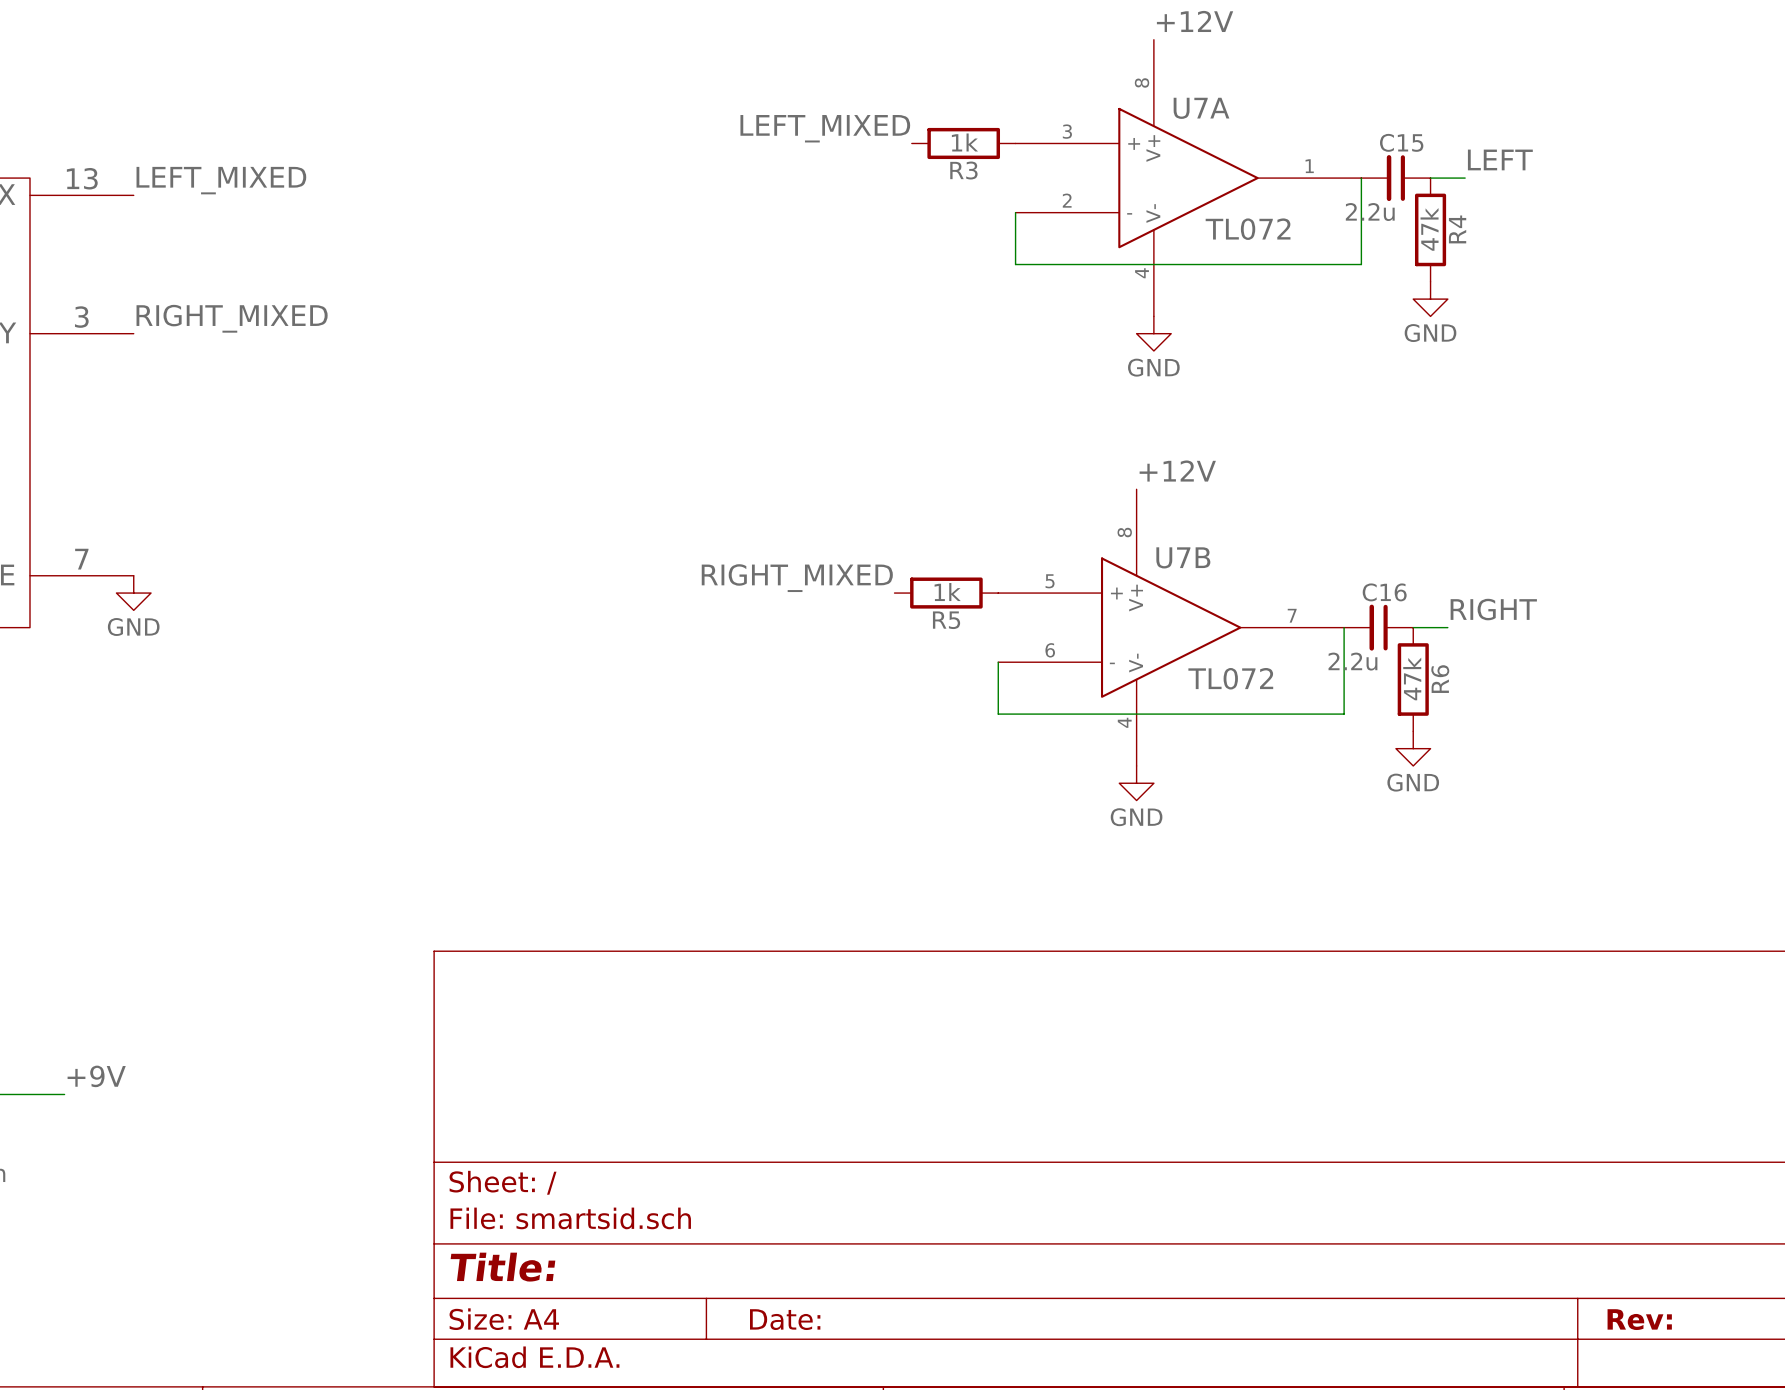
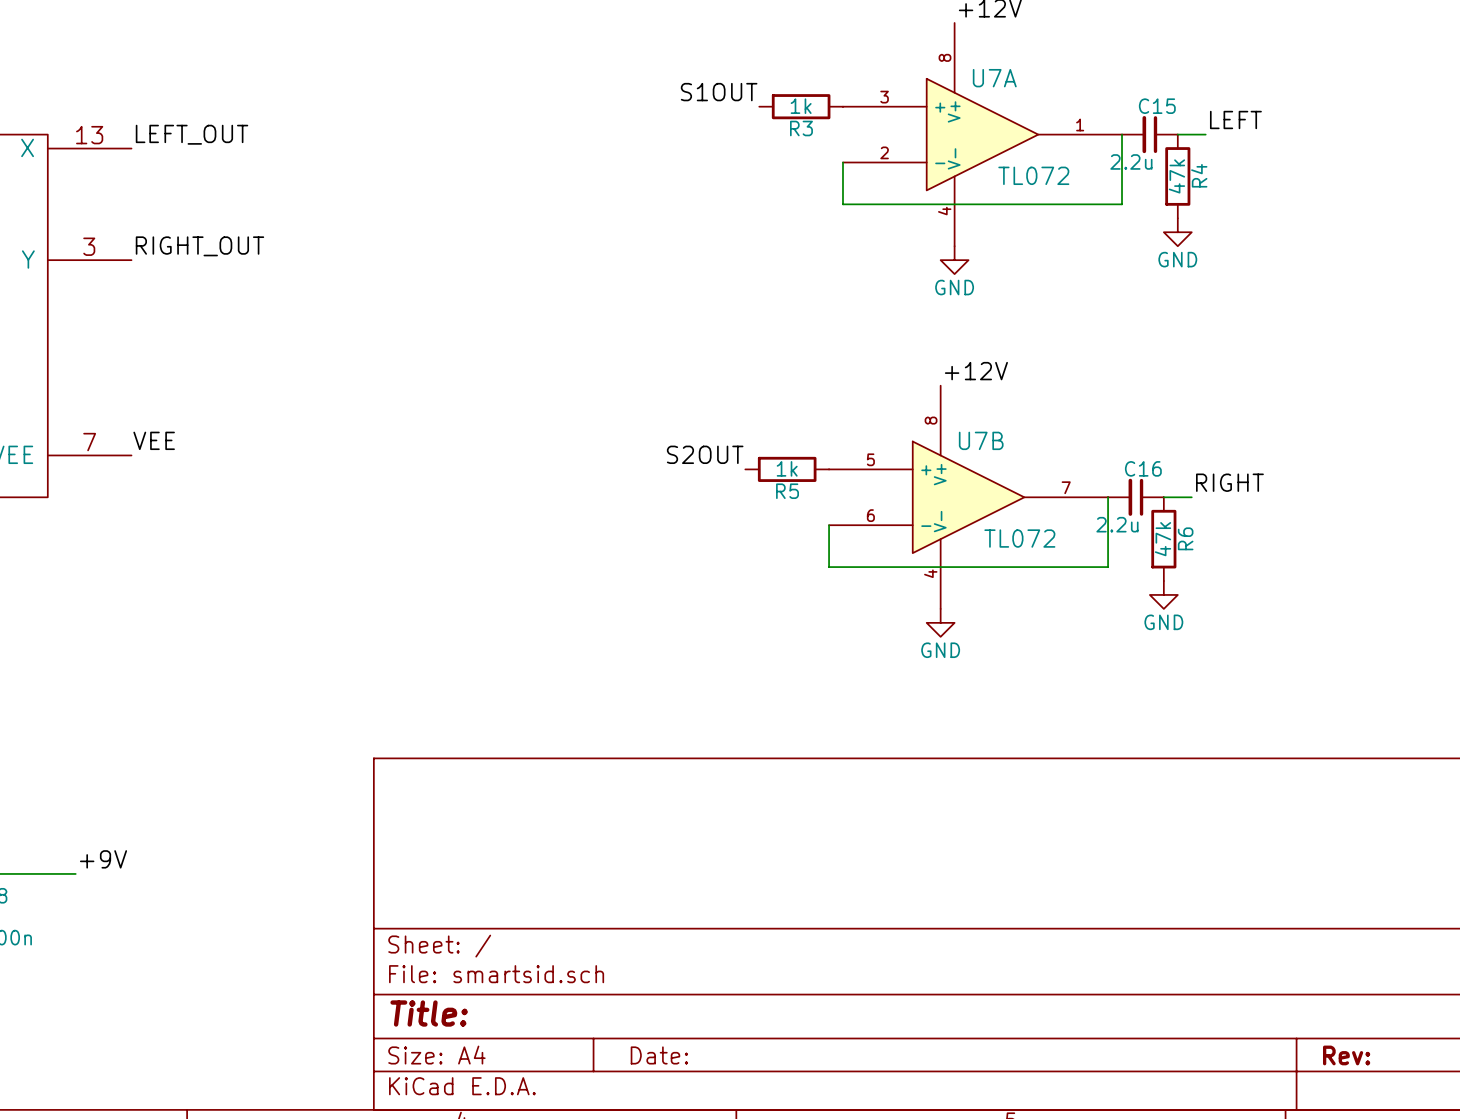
label: LEFT_MIXED (825, 128) -> S1OUT (719, 92)
label: LEFT_MIXED (221, 180) -> LEFT_OUT (192, 134)
label: RIGHT_MIXED (232, 318) -> RIGHT_OUT (199, 246)
label: none -> VEE (154, 440)
label: RIGHT_MIXED (797, 578) -> S2OUT (705, 454)
power symbol: GND (133, 593) -> none

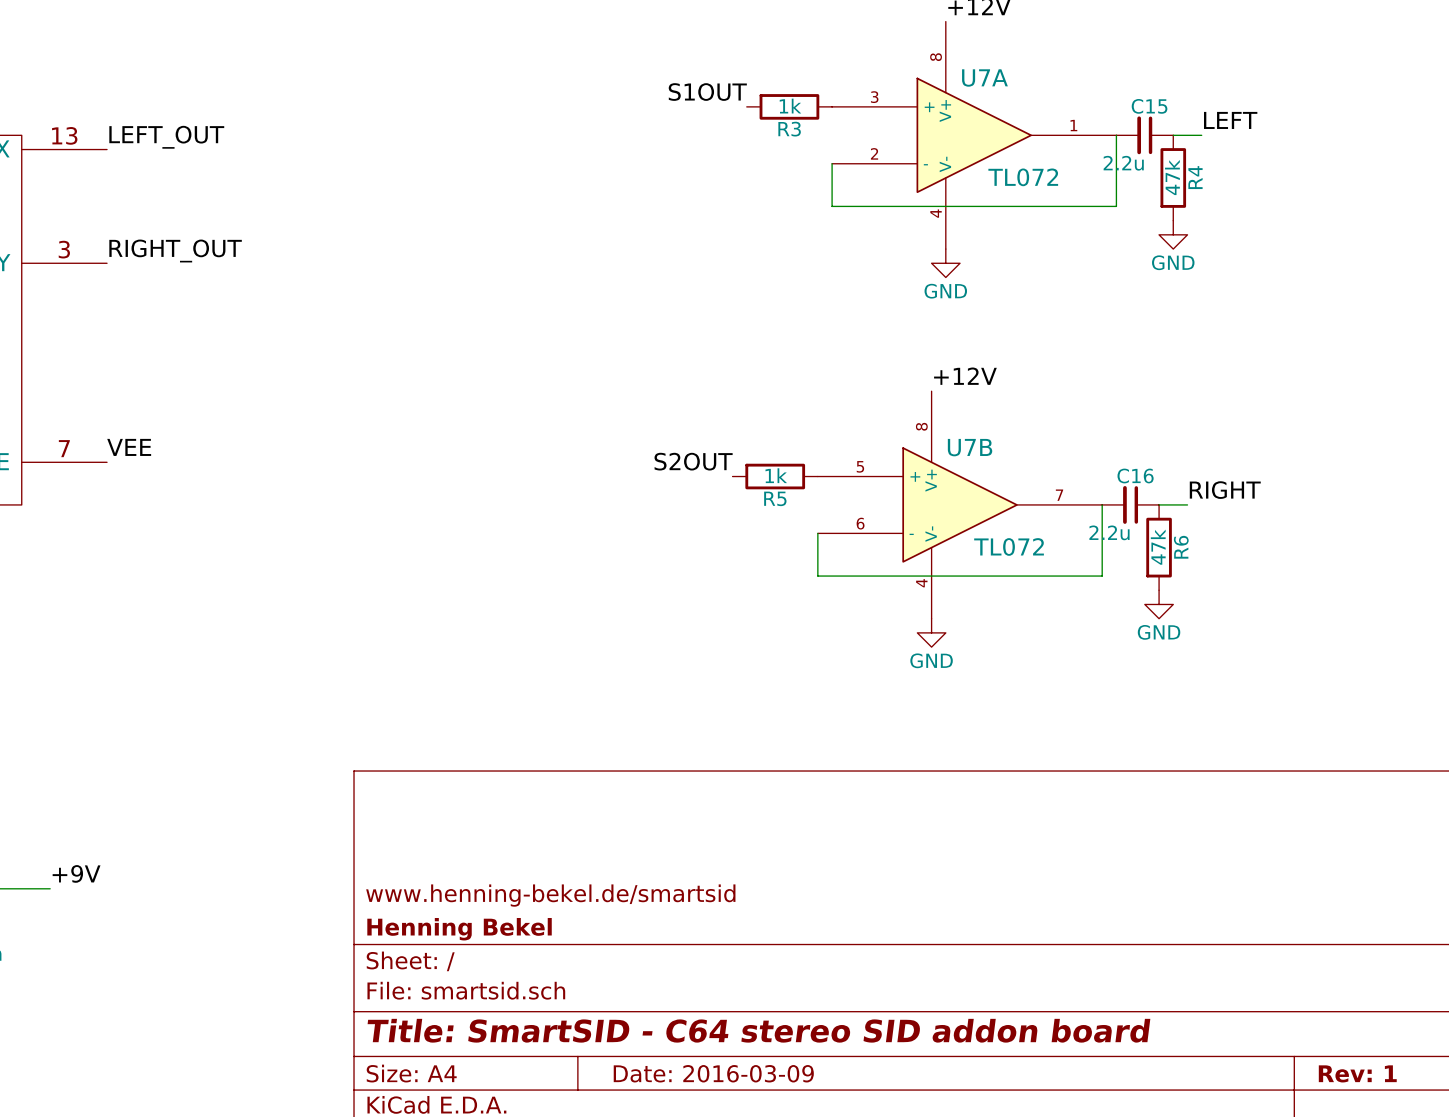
title block: none -> www.henning-bekel.de/smartsid (550, 895)
title block: none -> Henning Bekel (459, 929)
title block: Title: (429, 1013) -> Title: SmartSID - C64 stereo SID addon board (758, 1030)
title block: Date: (659, 1055) -> Date: 2016-03-09 (713, 1073)
title block: Rev: (1346, 1055) -> Rev: 1 (1357, 1073)

